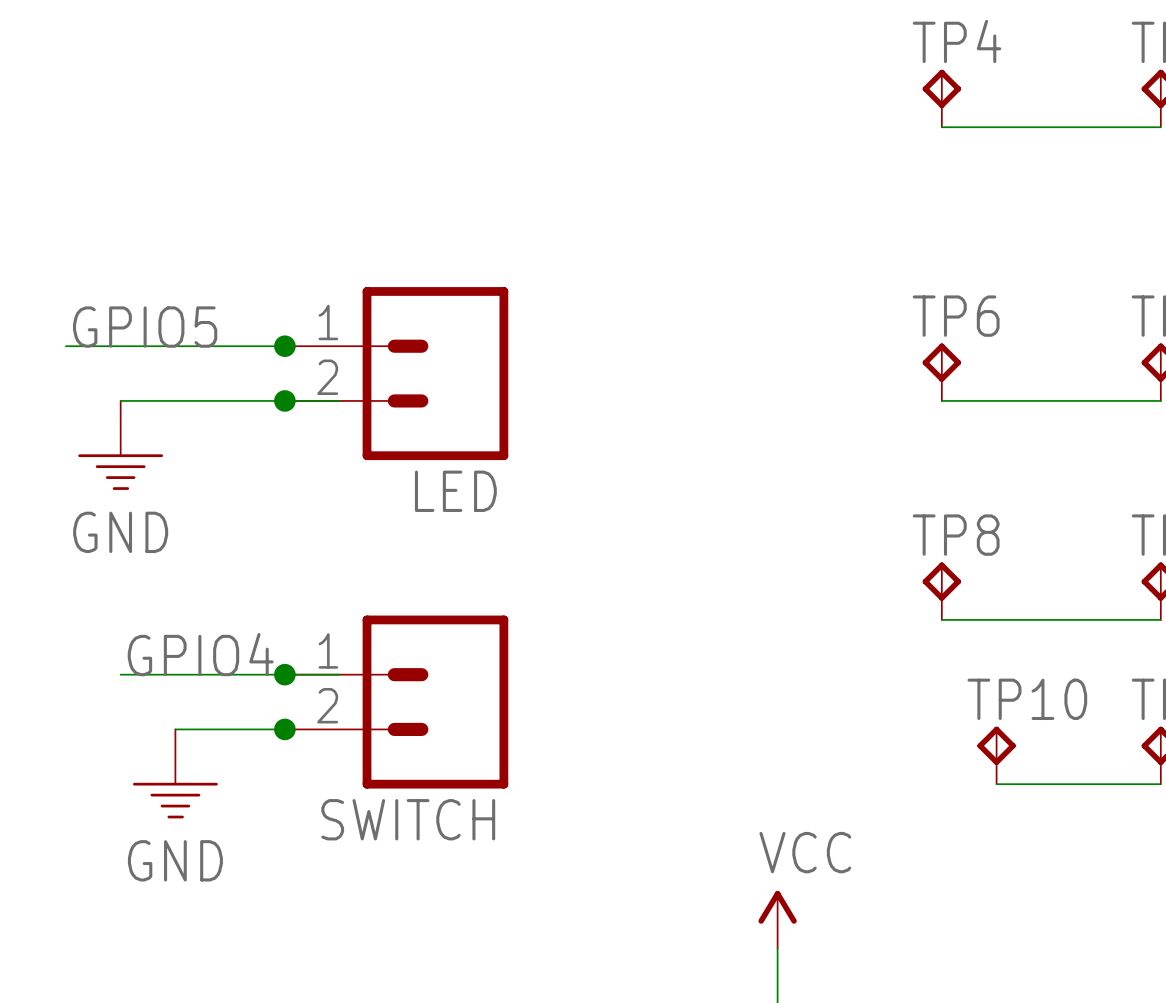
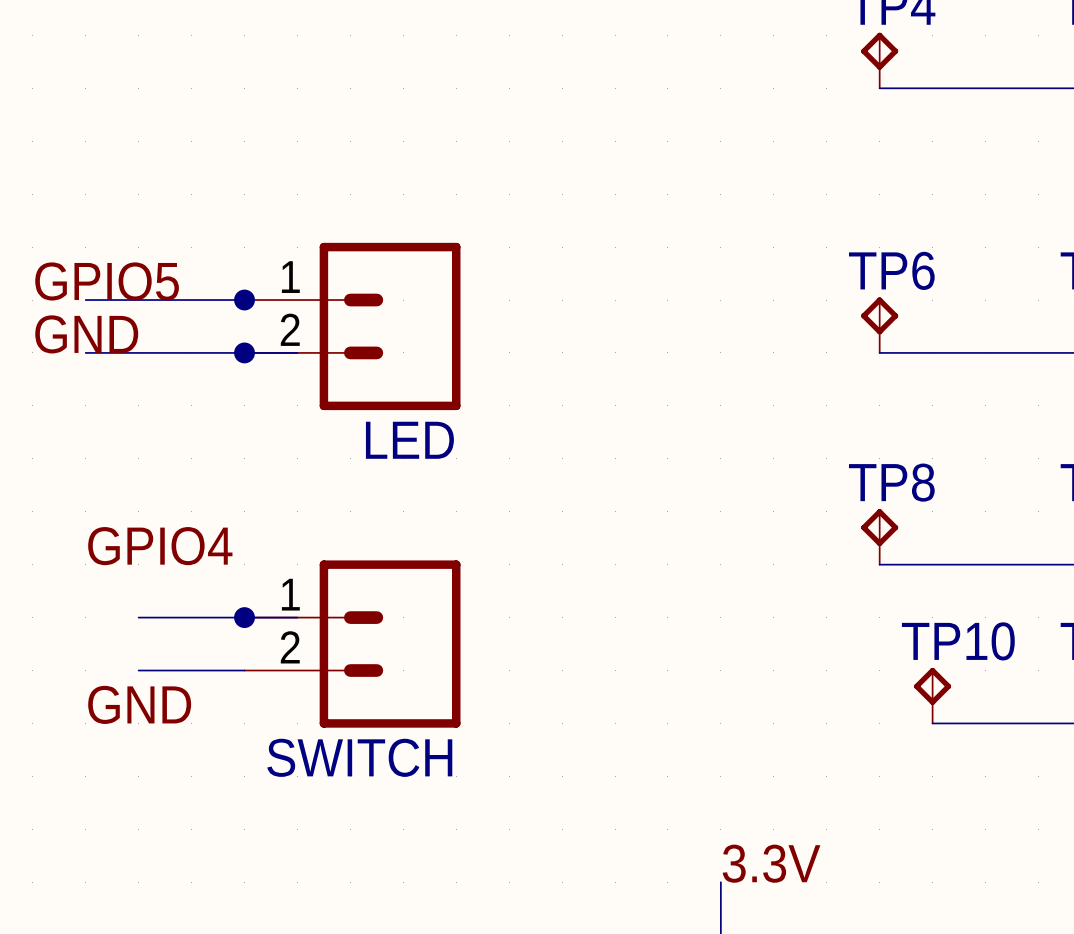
wire: (65, 346) (120, 346) -> none
label: none -> GND (86, 334)
power symbol: GND (120, 445) -> none
label position: GPIO4 (200, 654) -> GPIO4 (160, 546)
wire: (120, 674) (175, 674) -> none
junction: (284, 729) -> none
label: none -> GND (139, 704)
power symbol: GND (175, 773) -> none
power symbol: VCC (777, 919) -> none
label: none -> 3.3V (771, 863)

